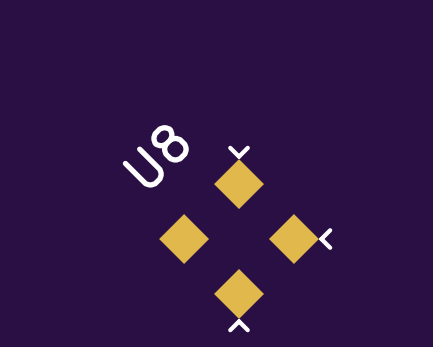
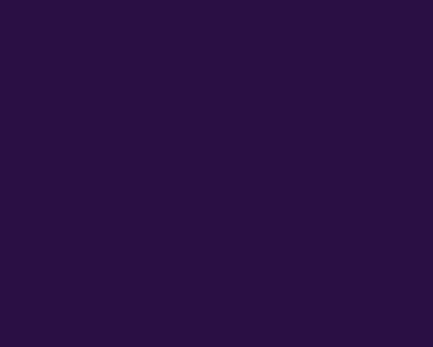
U8: (239, 239) -> none

